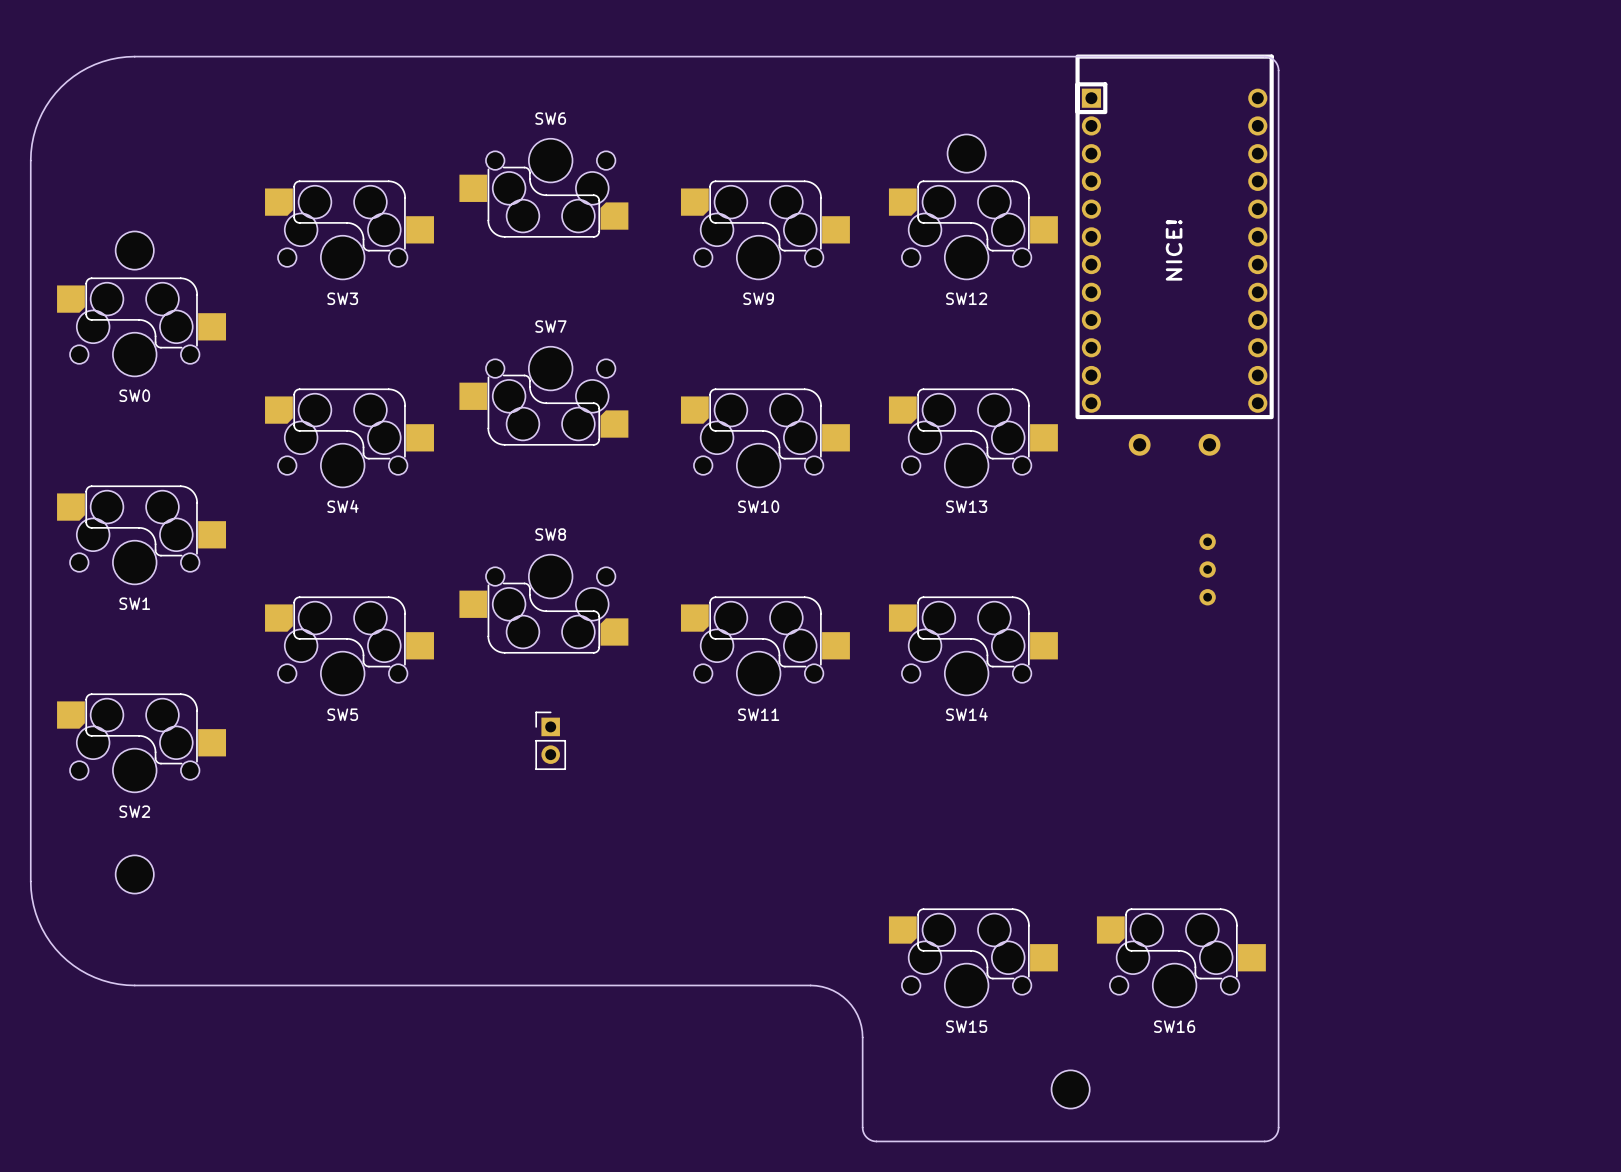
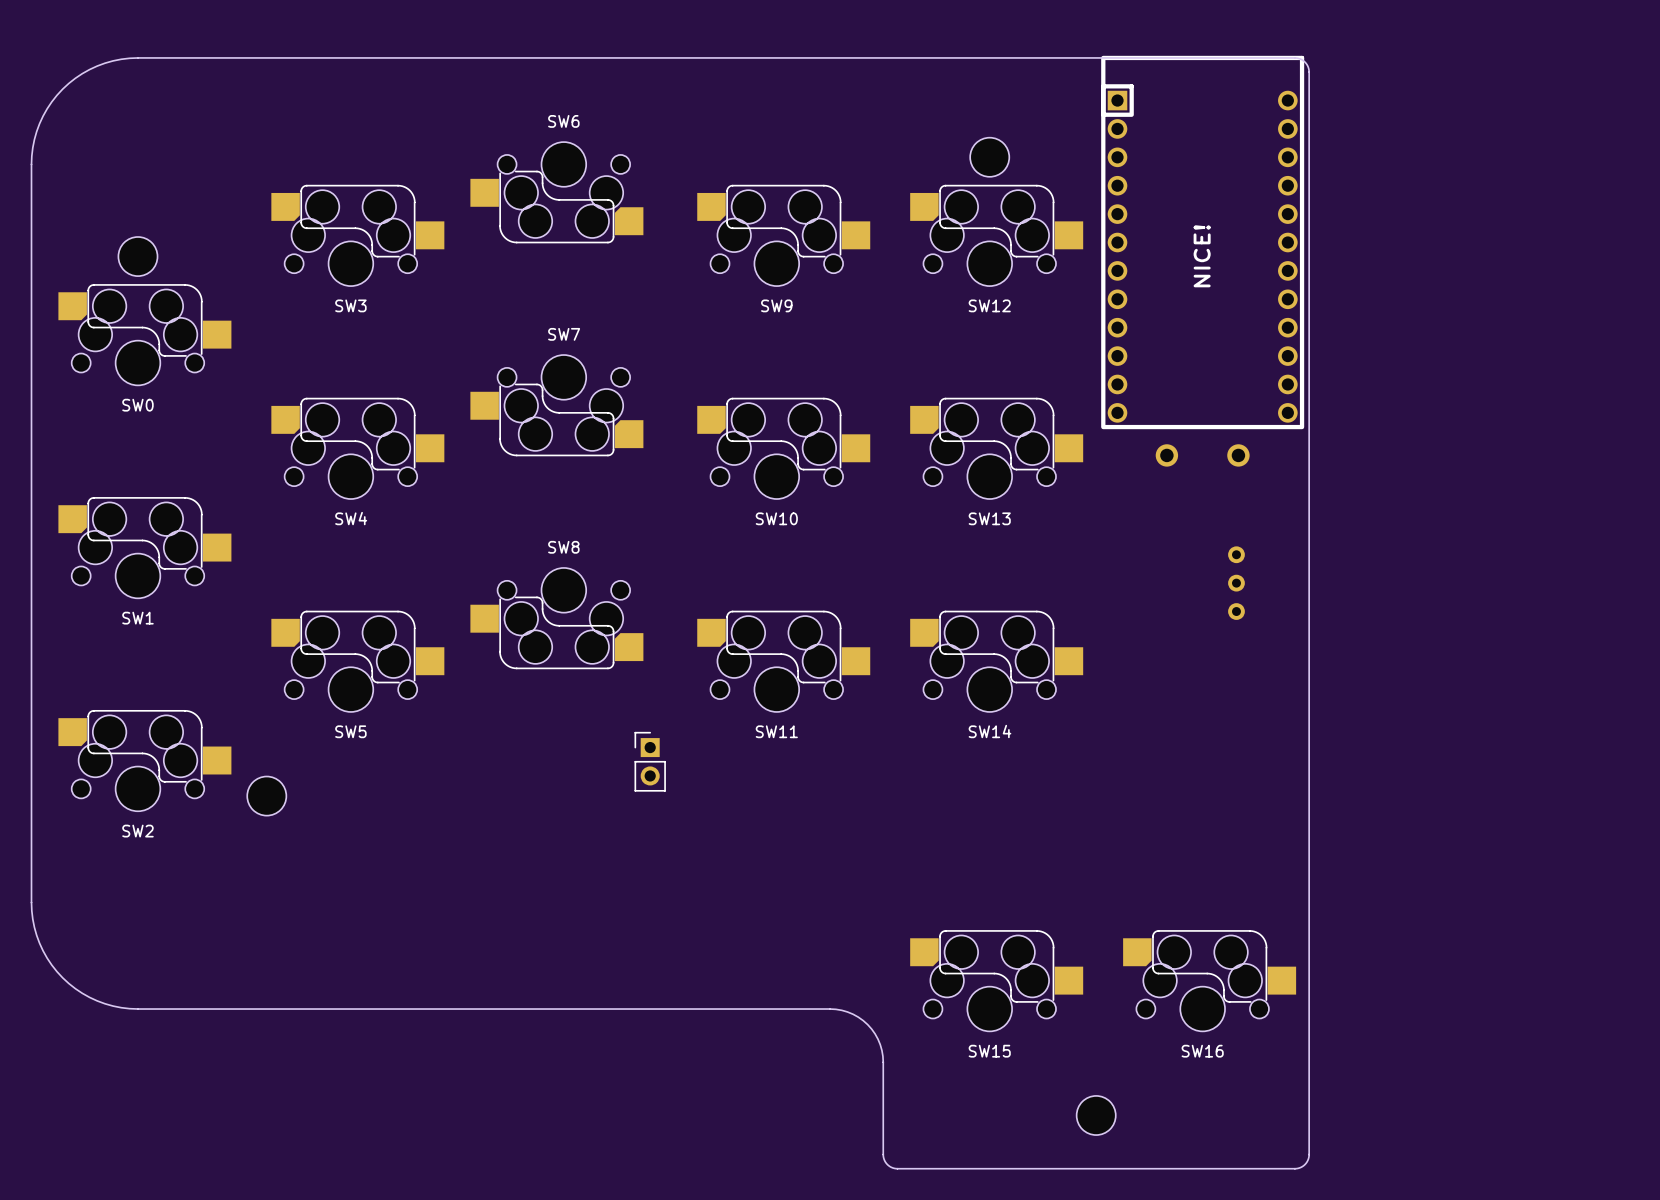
part position: (550, 740) -> (650, 761)
part position: (134, 874) -> (266, 796)

